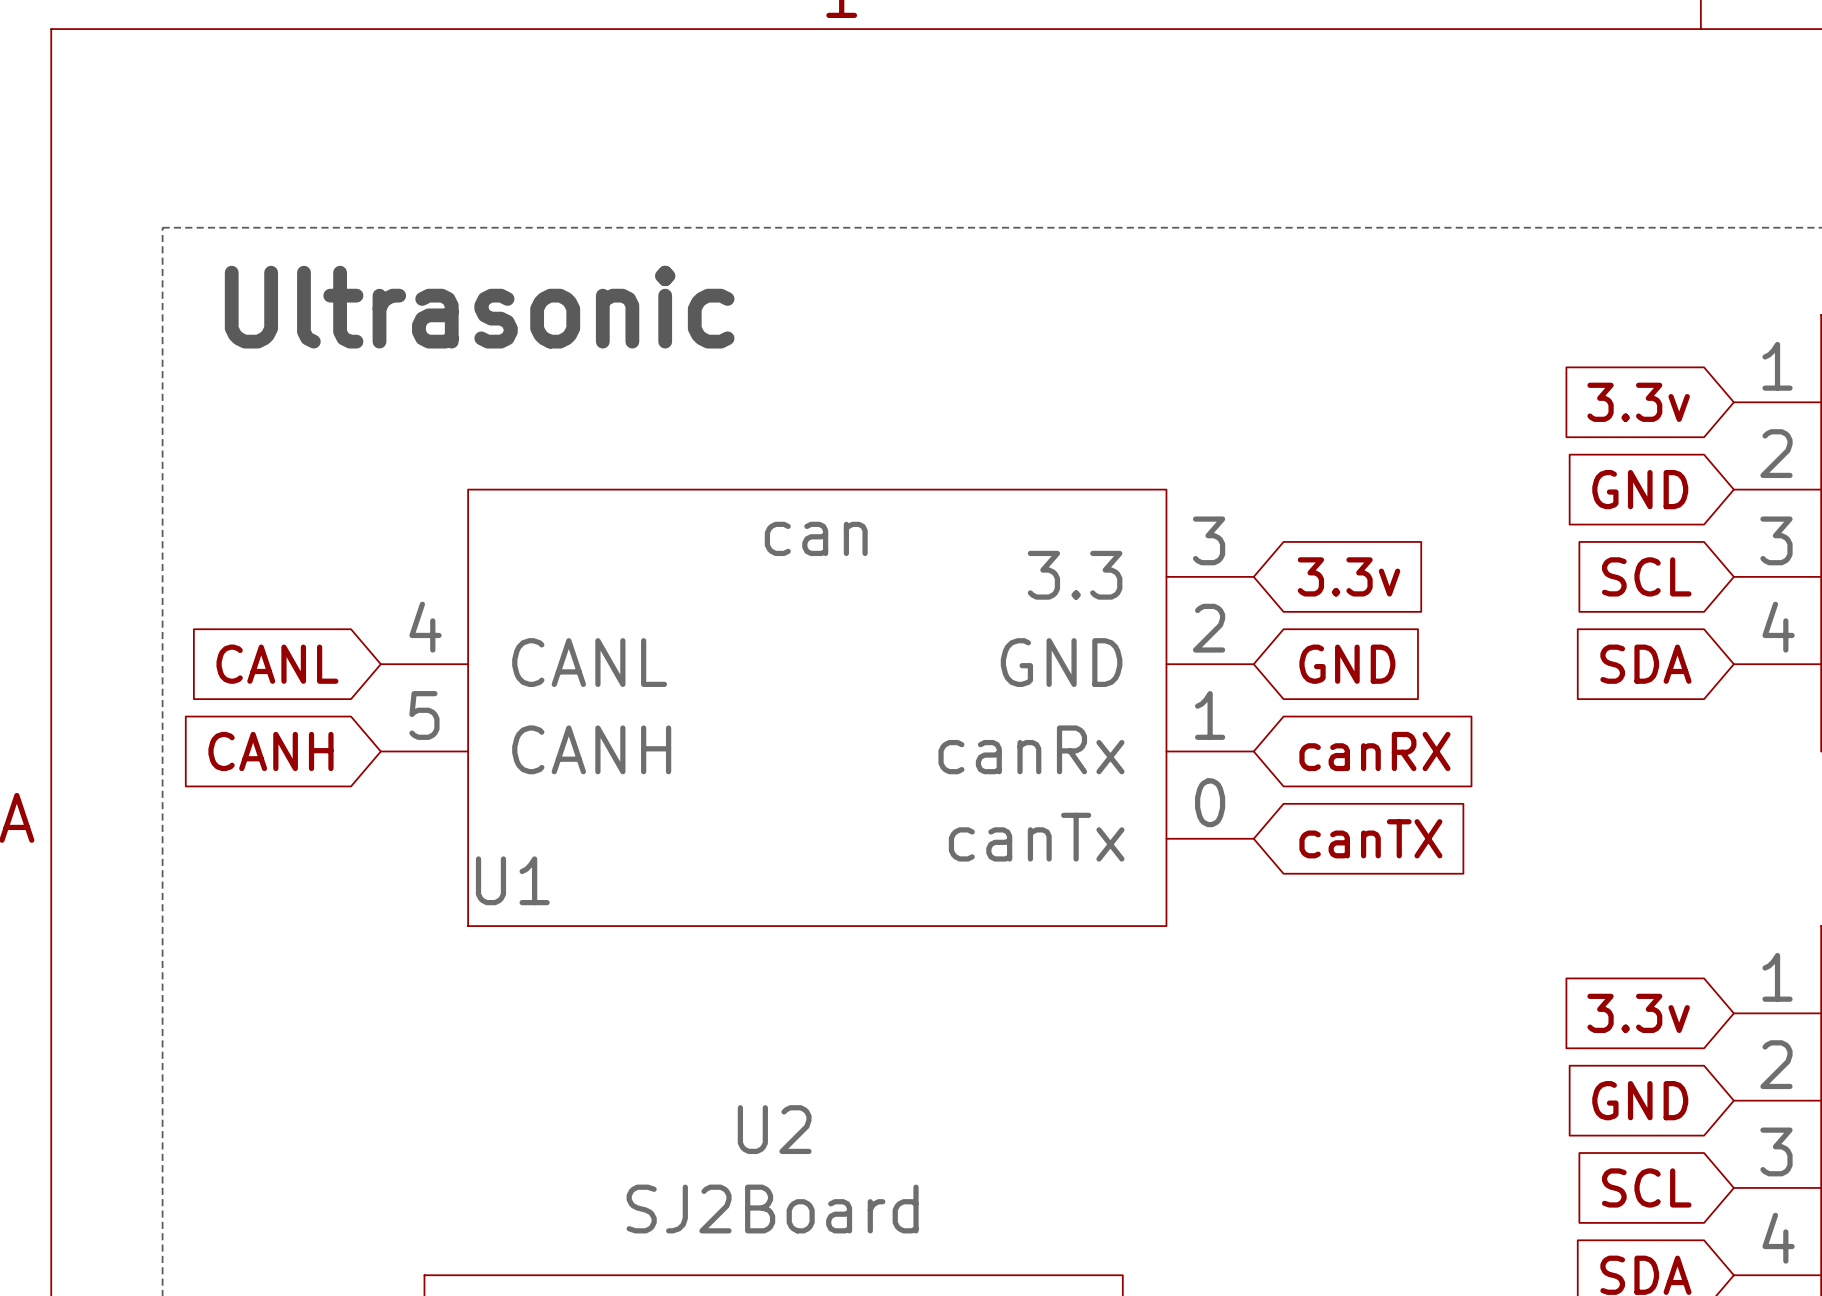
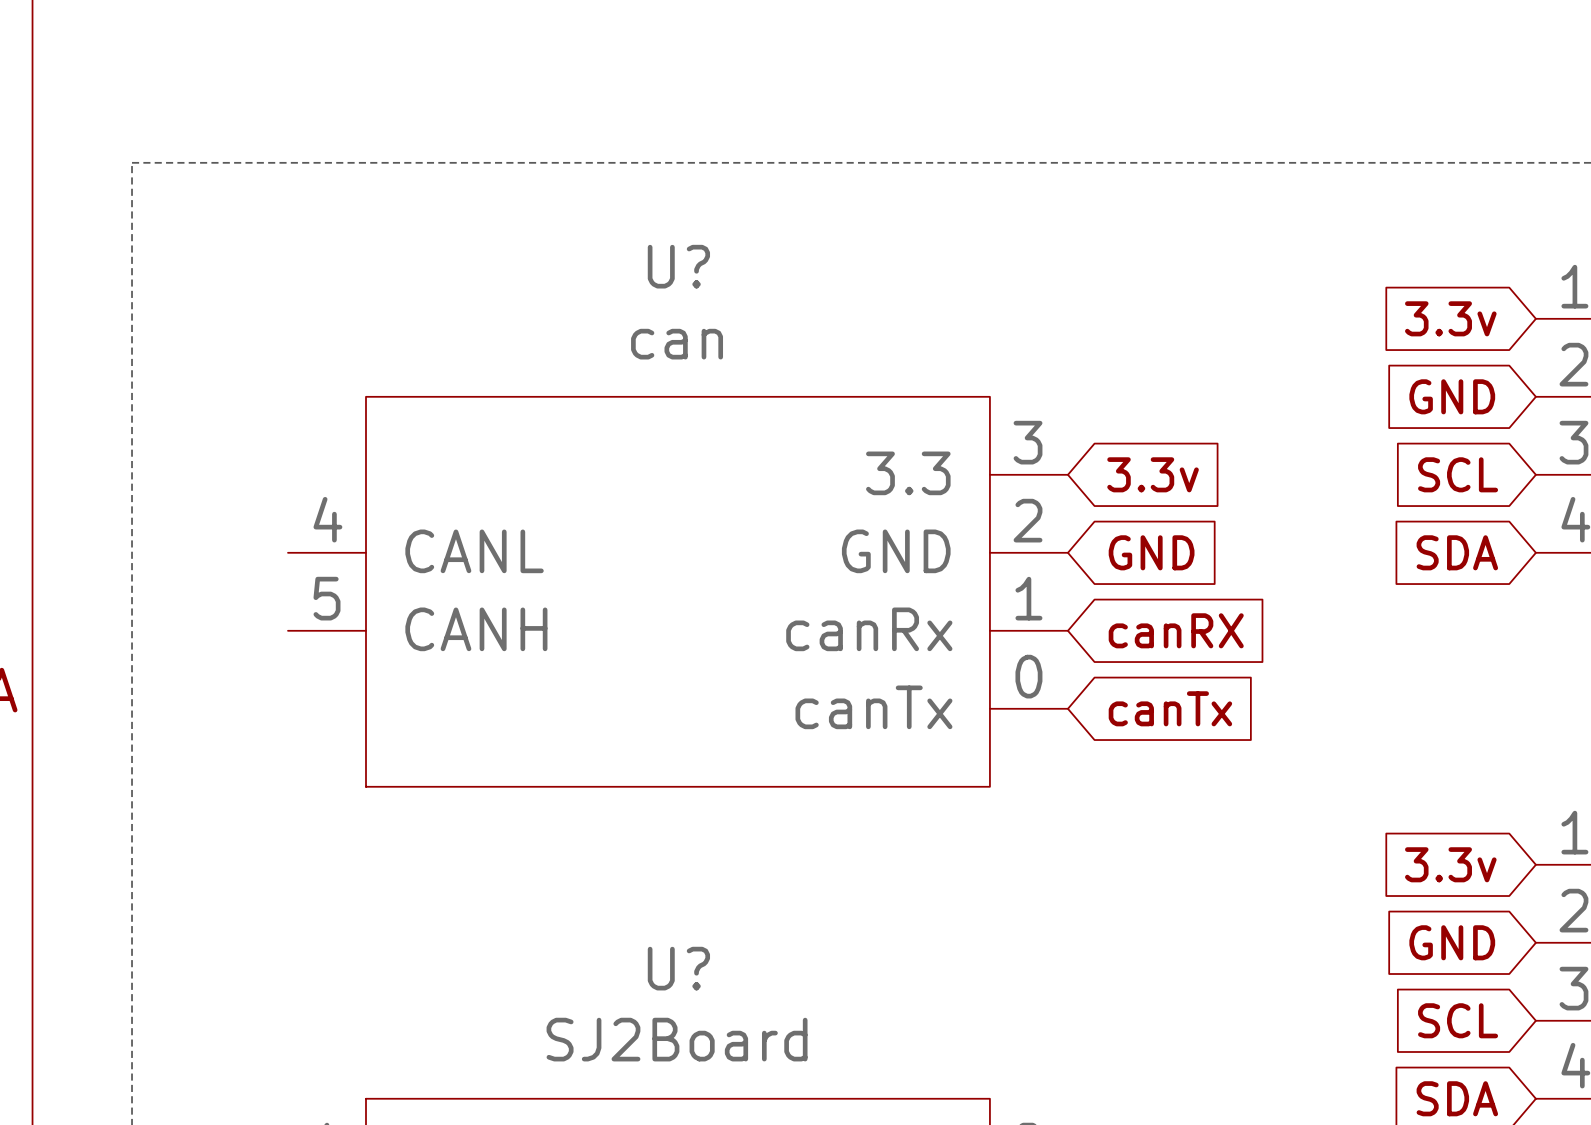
text: Ultrasonic (479, 307) -> none
global label position: 3.3v (1349, 576) -> 3.3v (1153, 474)
global label: CANL (277, 664) -> none
global label position: GND (1347, 664) -> GND (1151, 552)
U?: none -> can (677, 591)
U1: can (817, 707) -> none
global label: CANH (270, 751) -> none
global label position: canRX (1374, 751) -> canRX (1176, 630)
global label: canTX (1370, 838) -> canTx (1170, 708)
U2 name: U2 (774, 1129) -> U? (678, 968)

